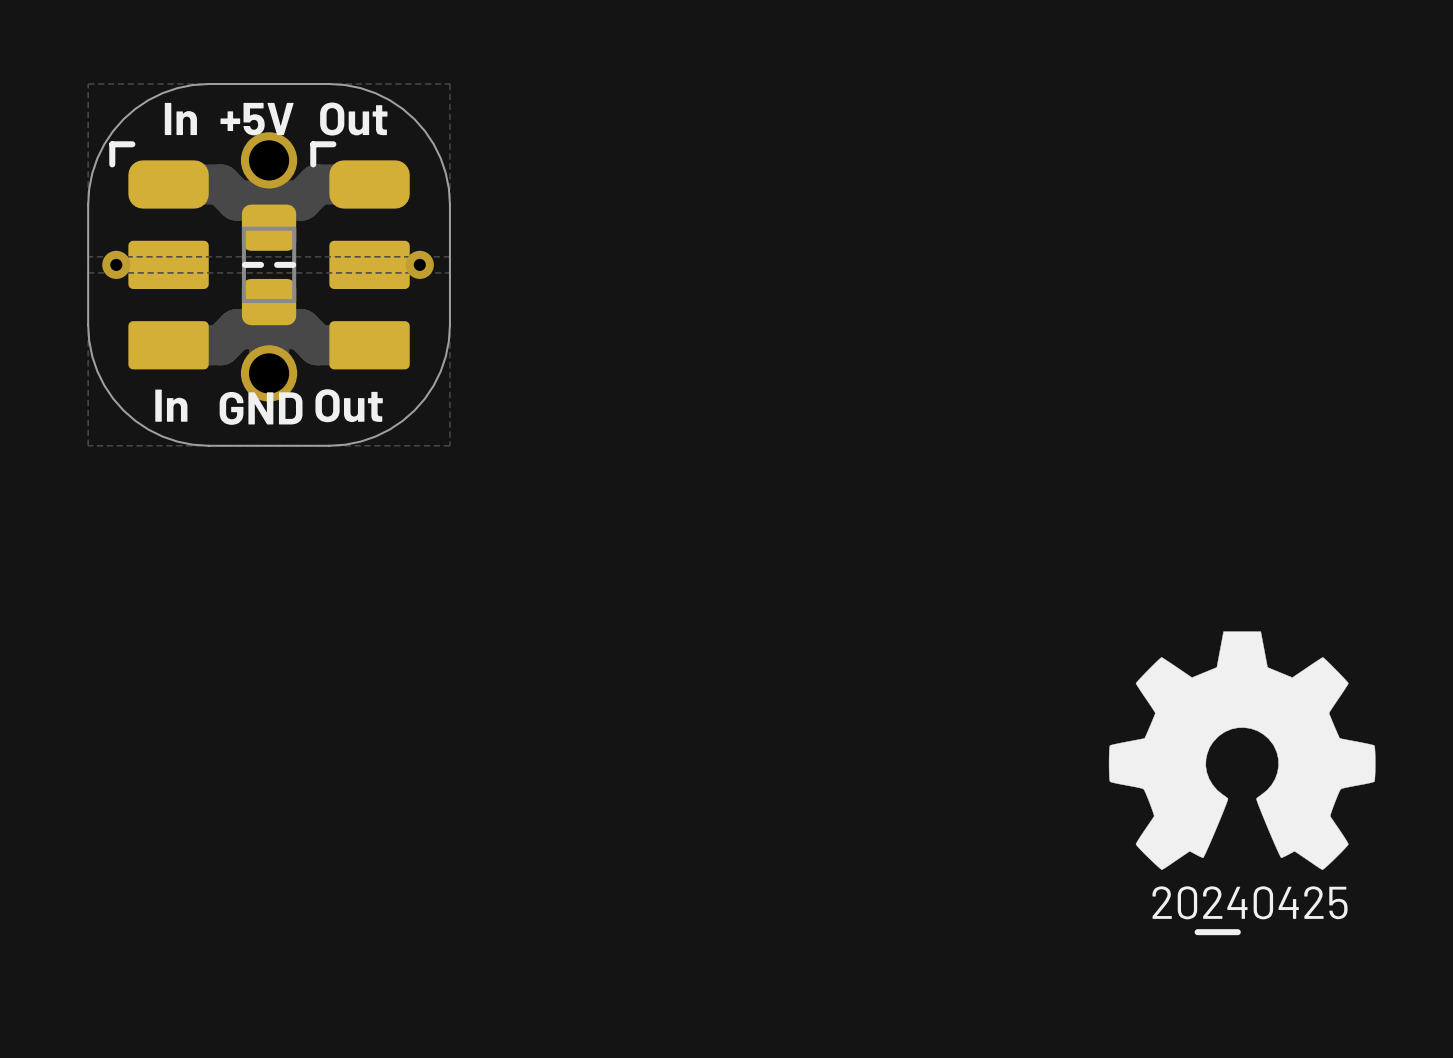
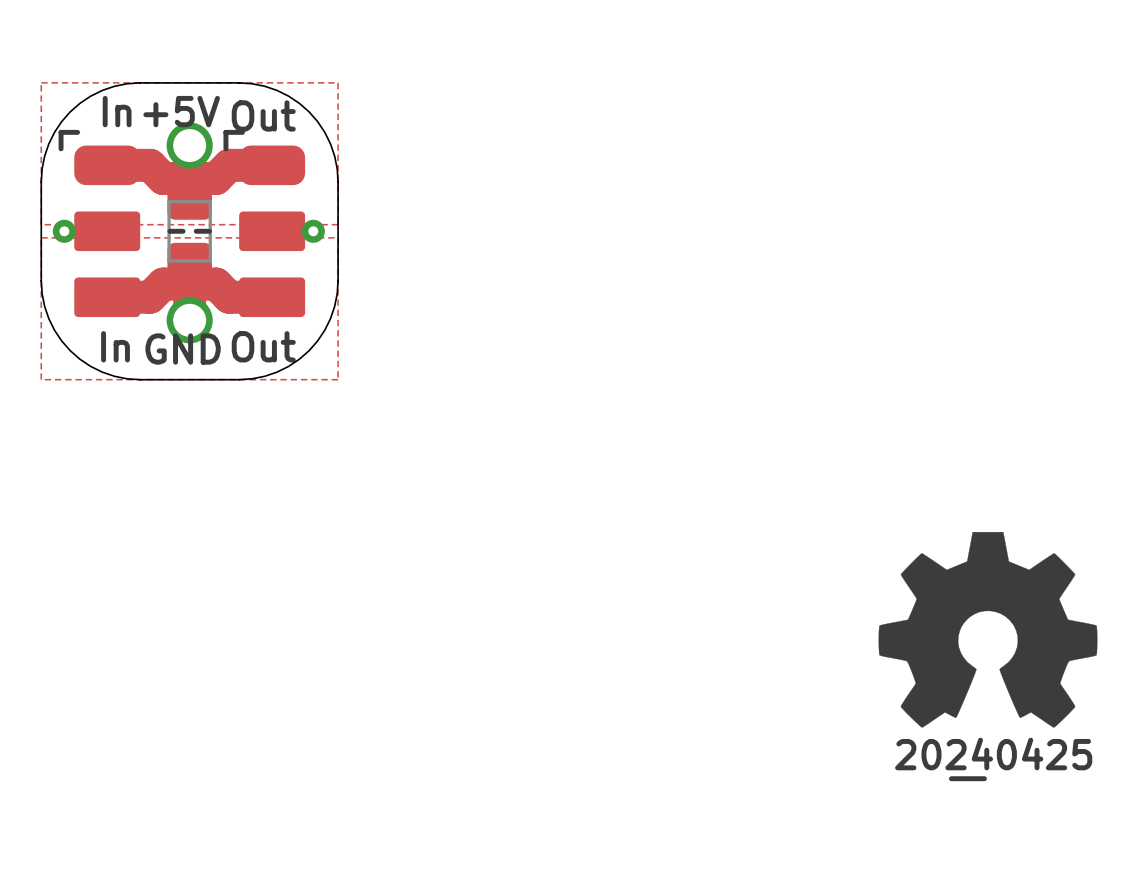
text position: Out (353, 119) -> Out (263, 115)

